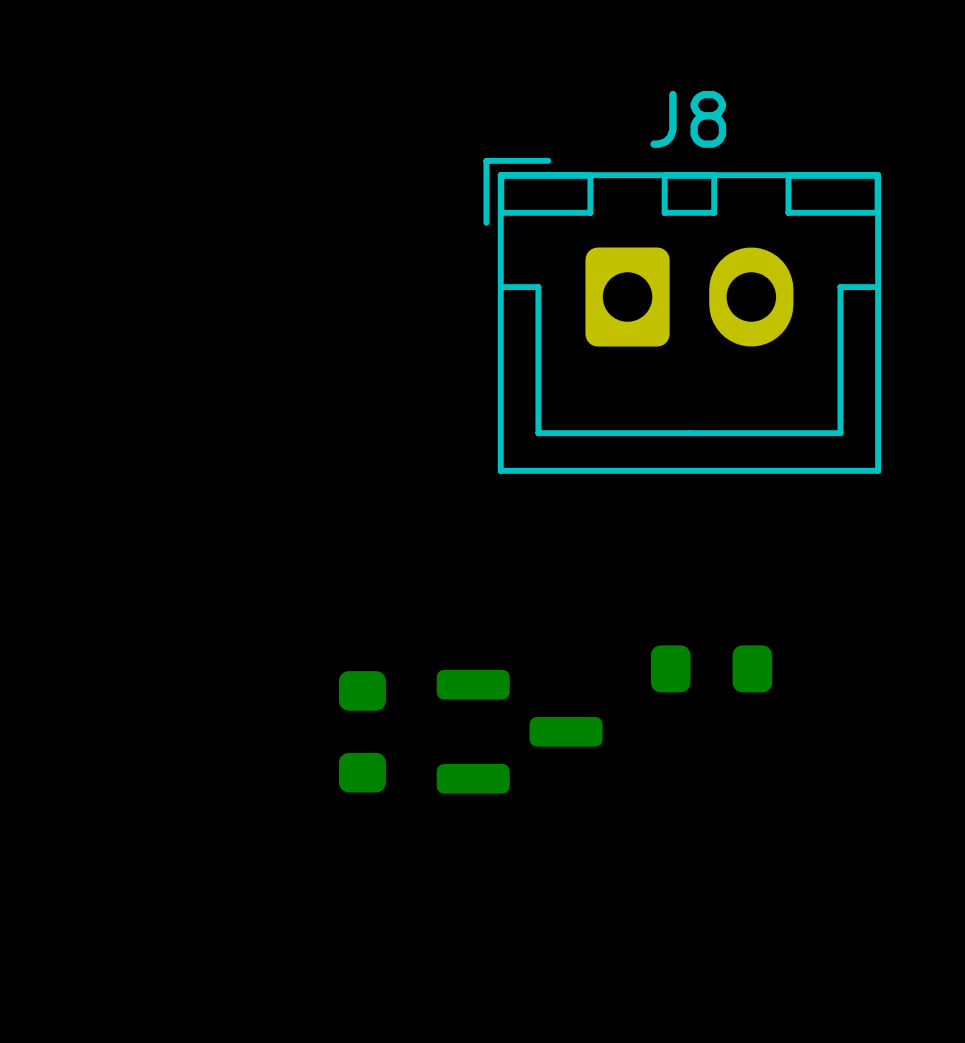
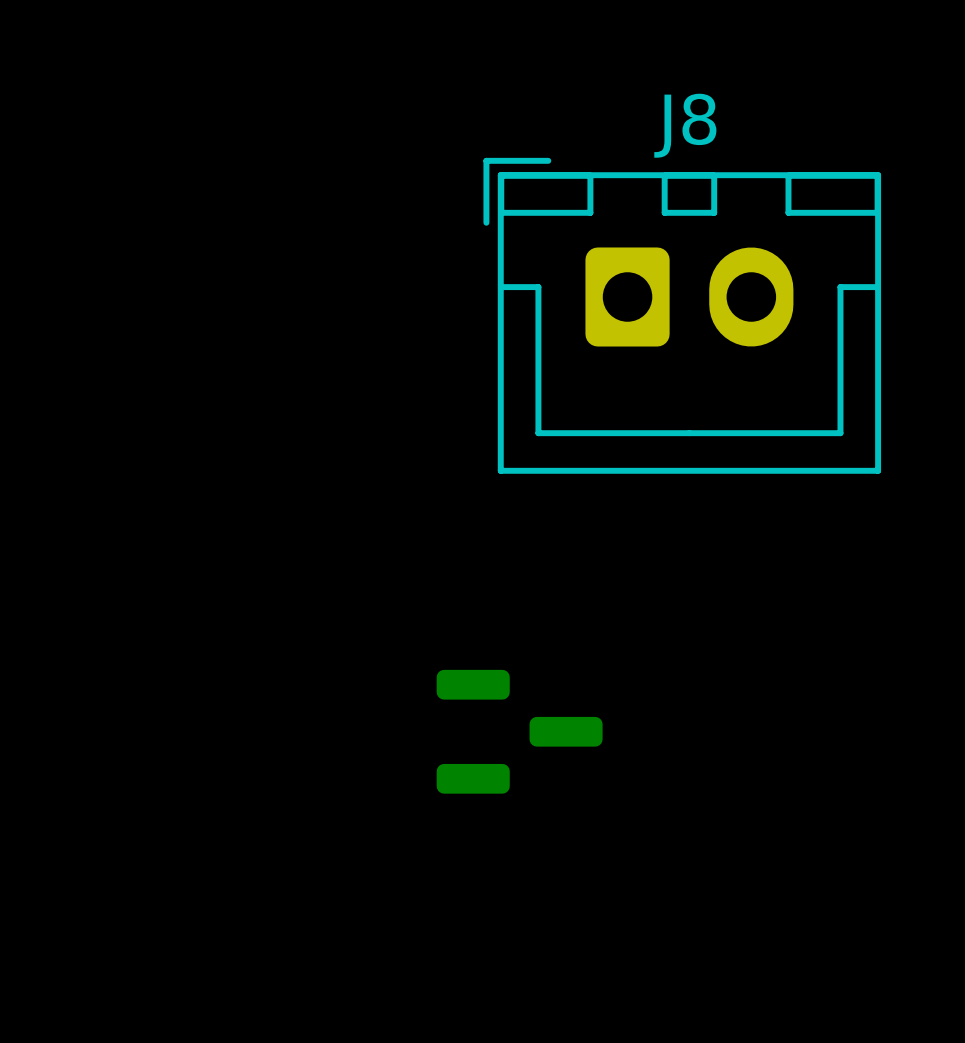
part: (711, 668) -> none
part: (362, 731) -> none

